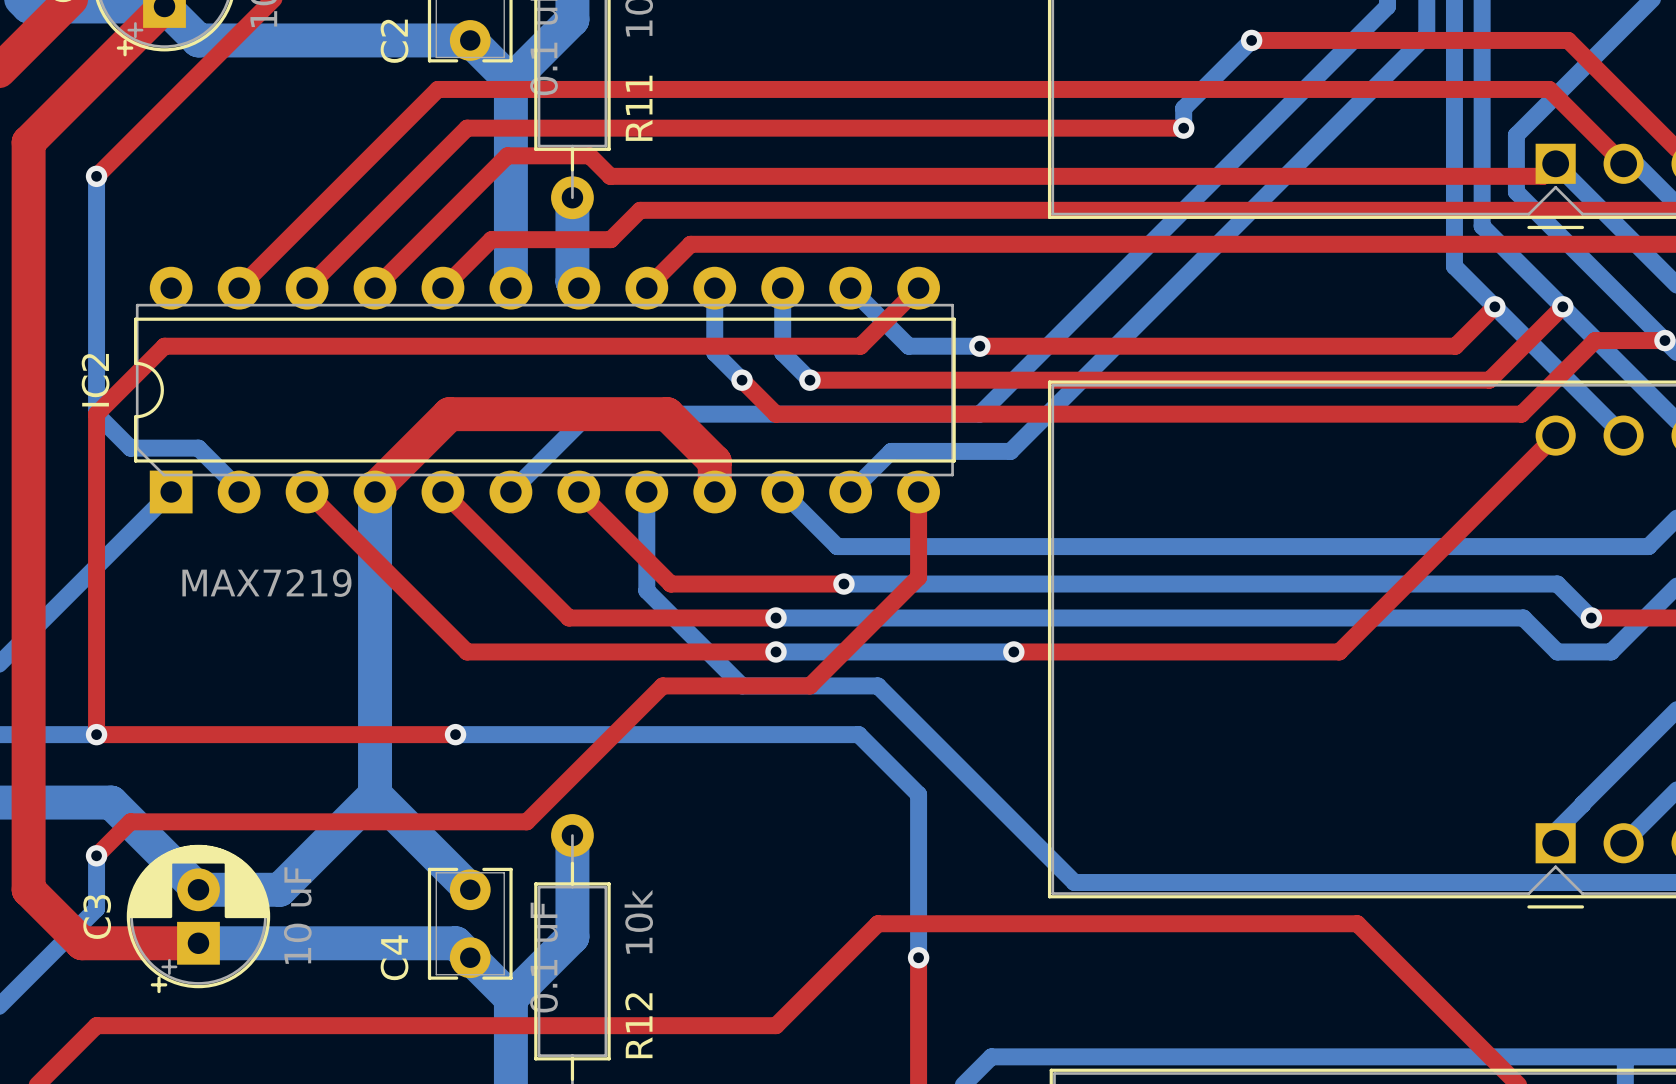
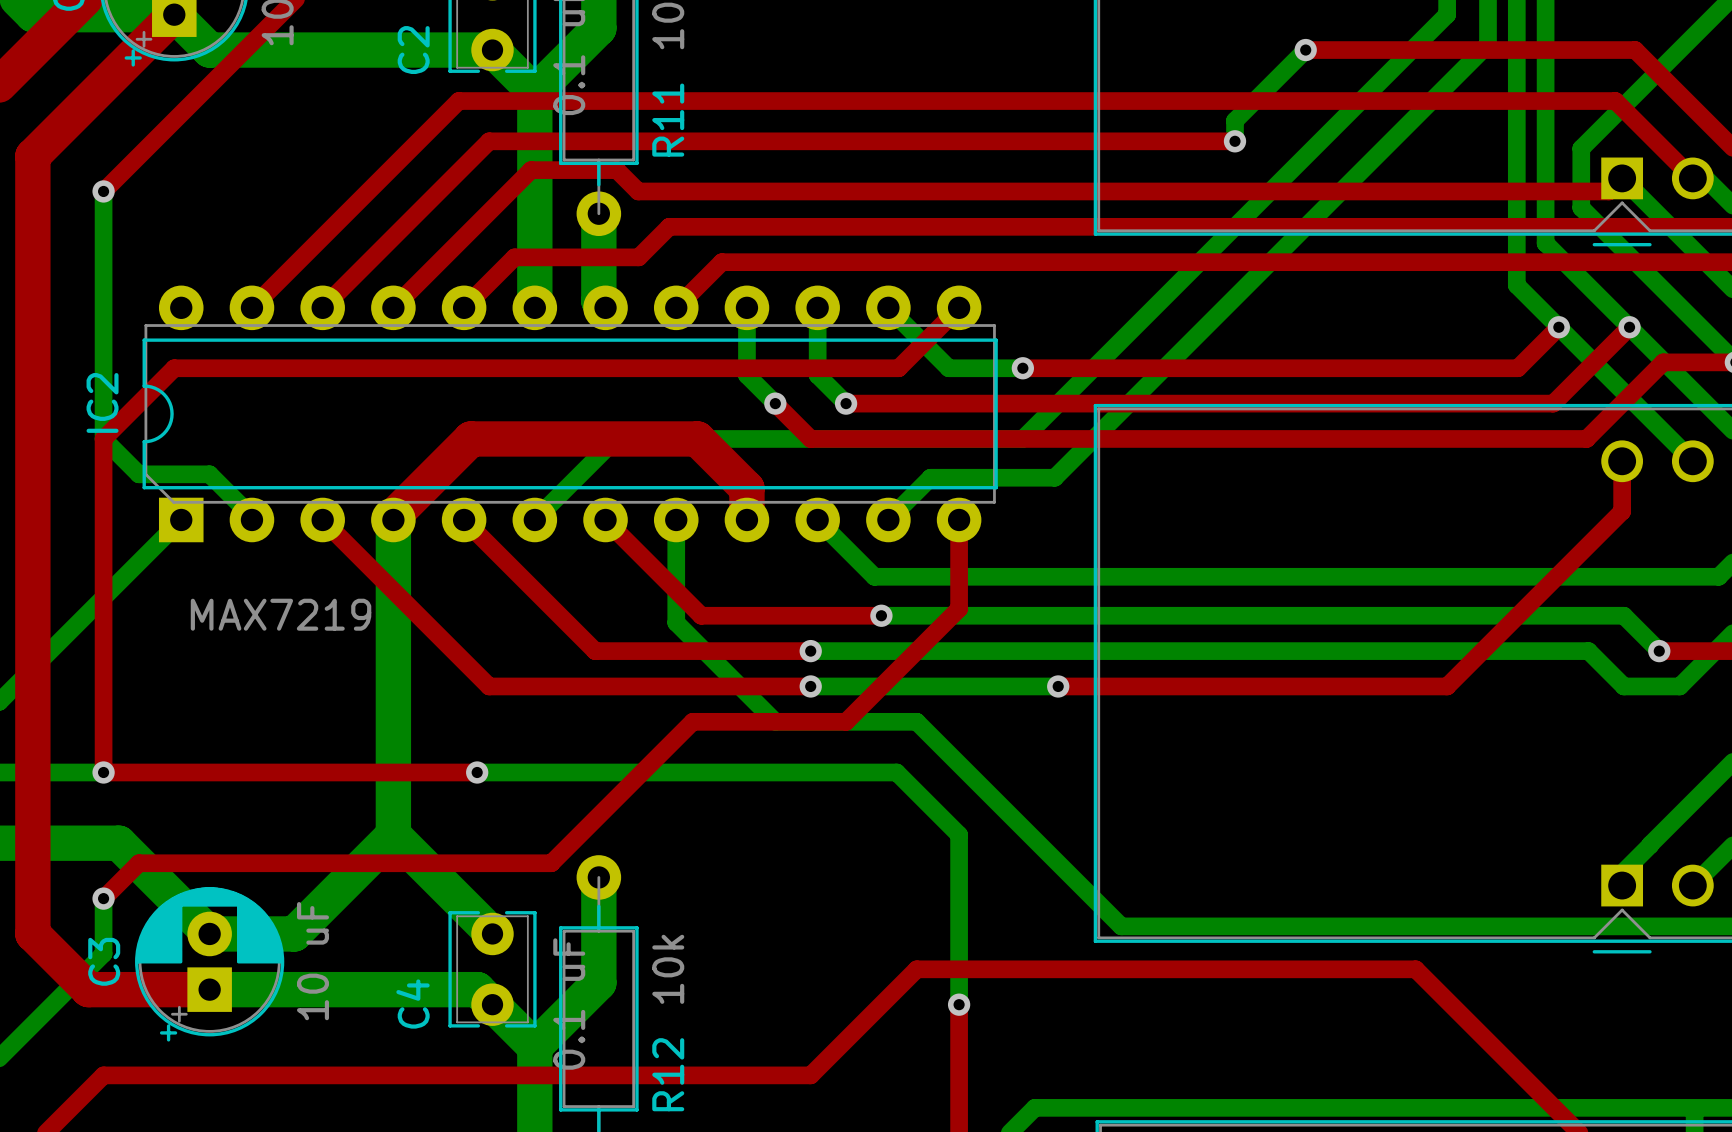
top track: (1555, 435) (1339, 651) -> (1622, 461) (1622, 511) (1447, 686) (1396, 686)

